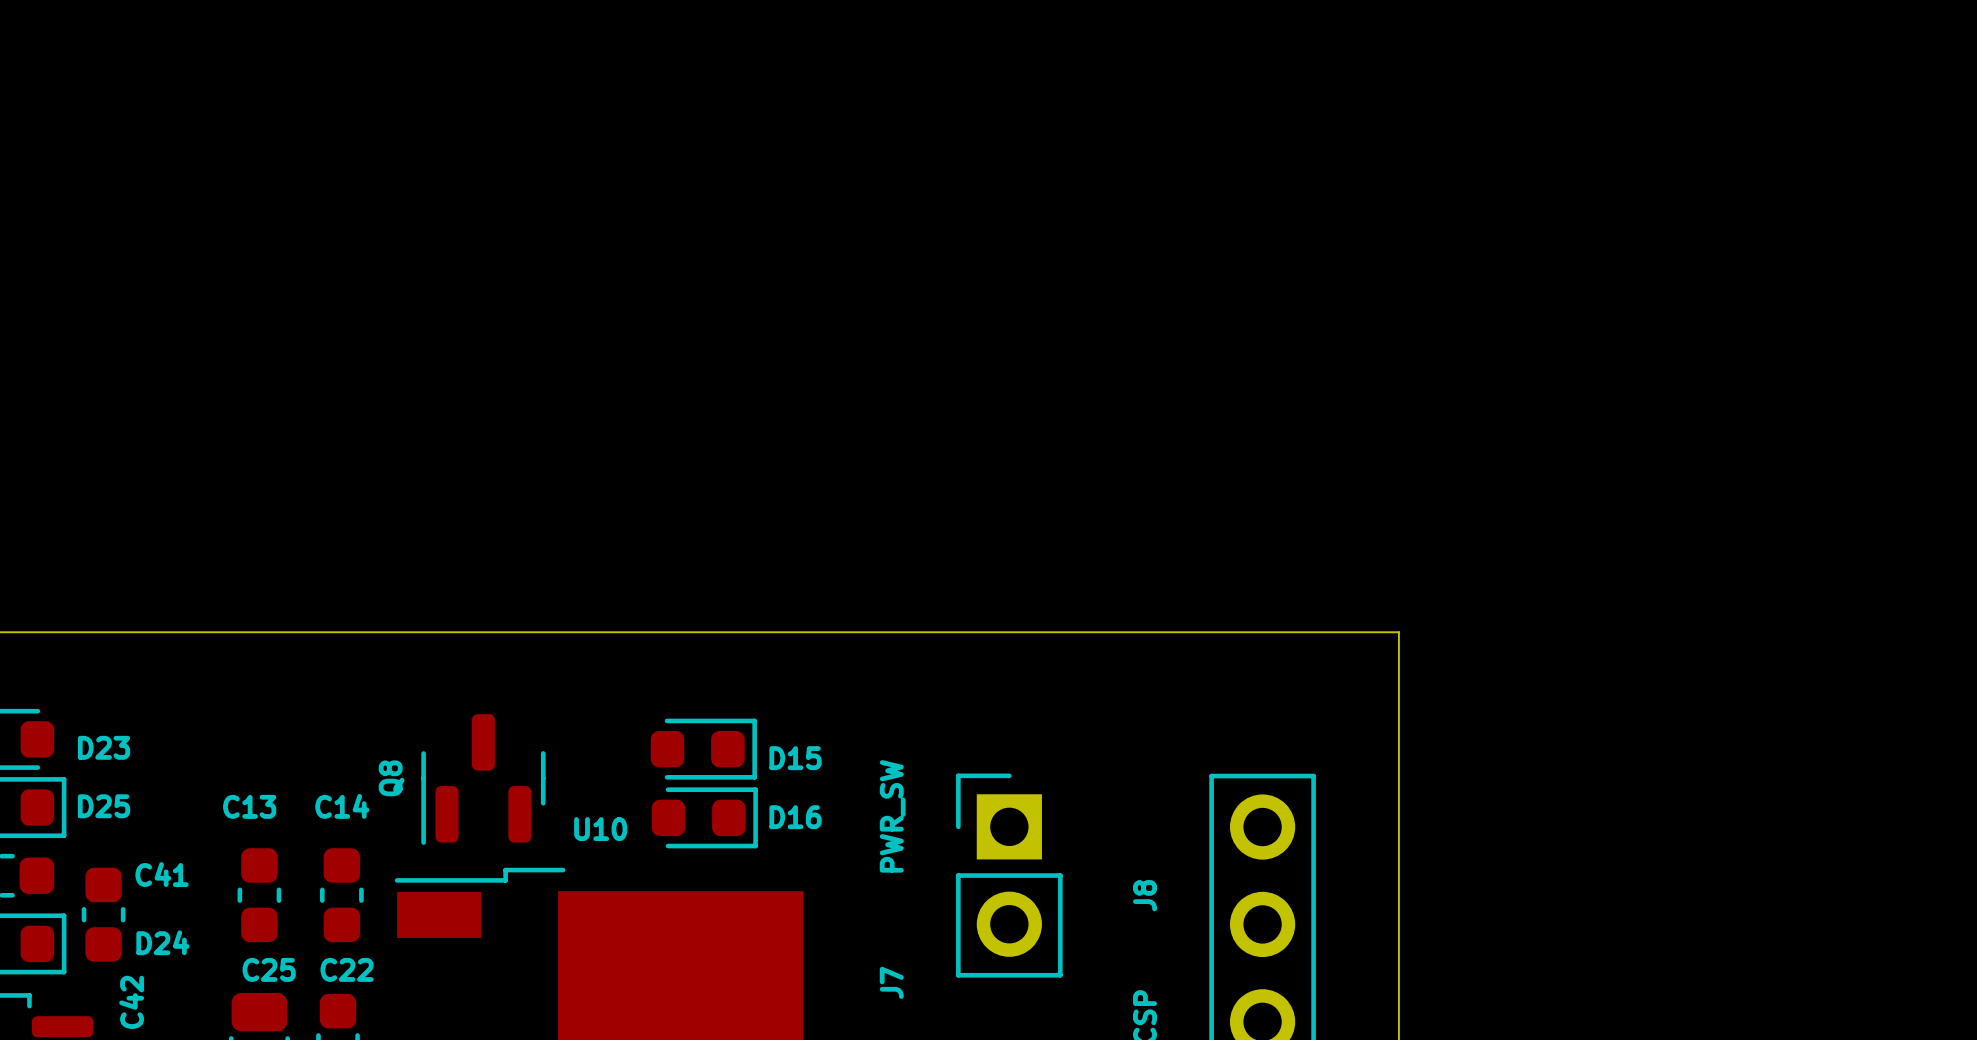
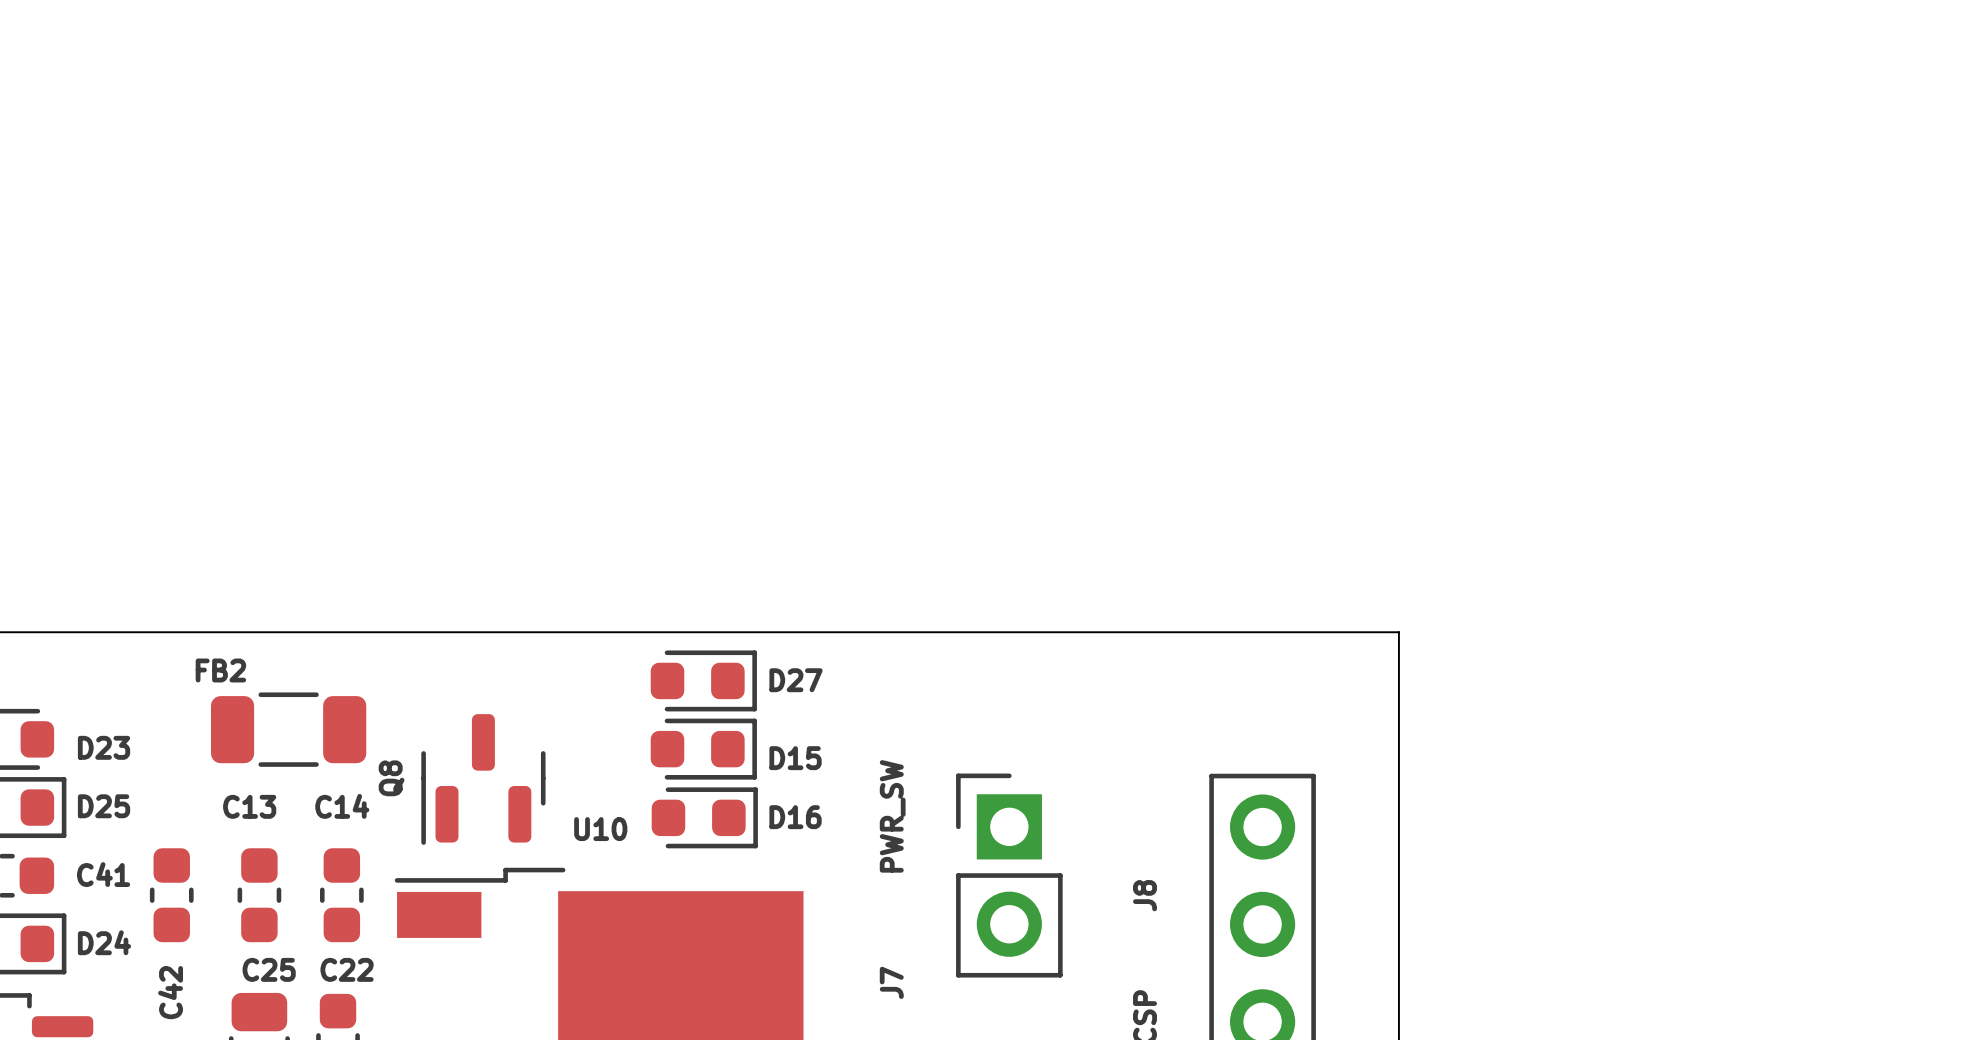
D27: none -> (703, 680)
FB2: none -> (288, 729)
C41 name position: C41 (162, 874) -> C41 (103, 874)
C42 position: (103, 914) -> (171, 895)
D24 name position: D24 (162, 942) -> D24 (104, 942)
C42 name position: C42 (131, 1002) -> C42 (170, 992)

